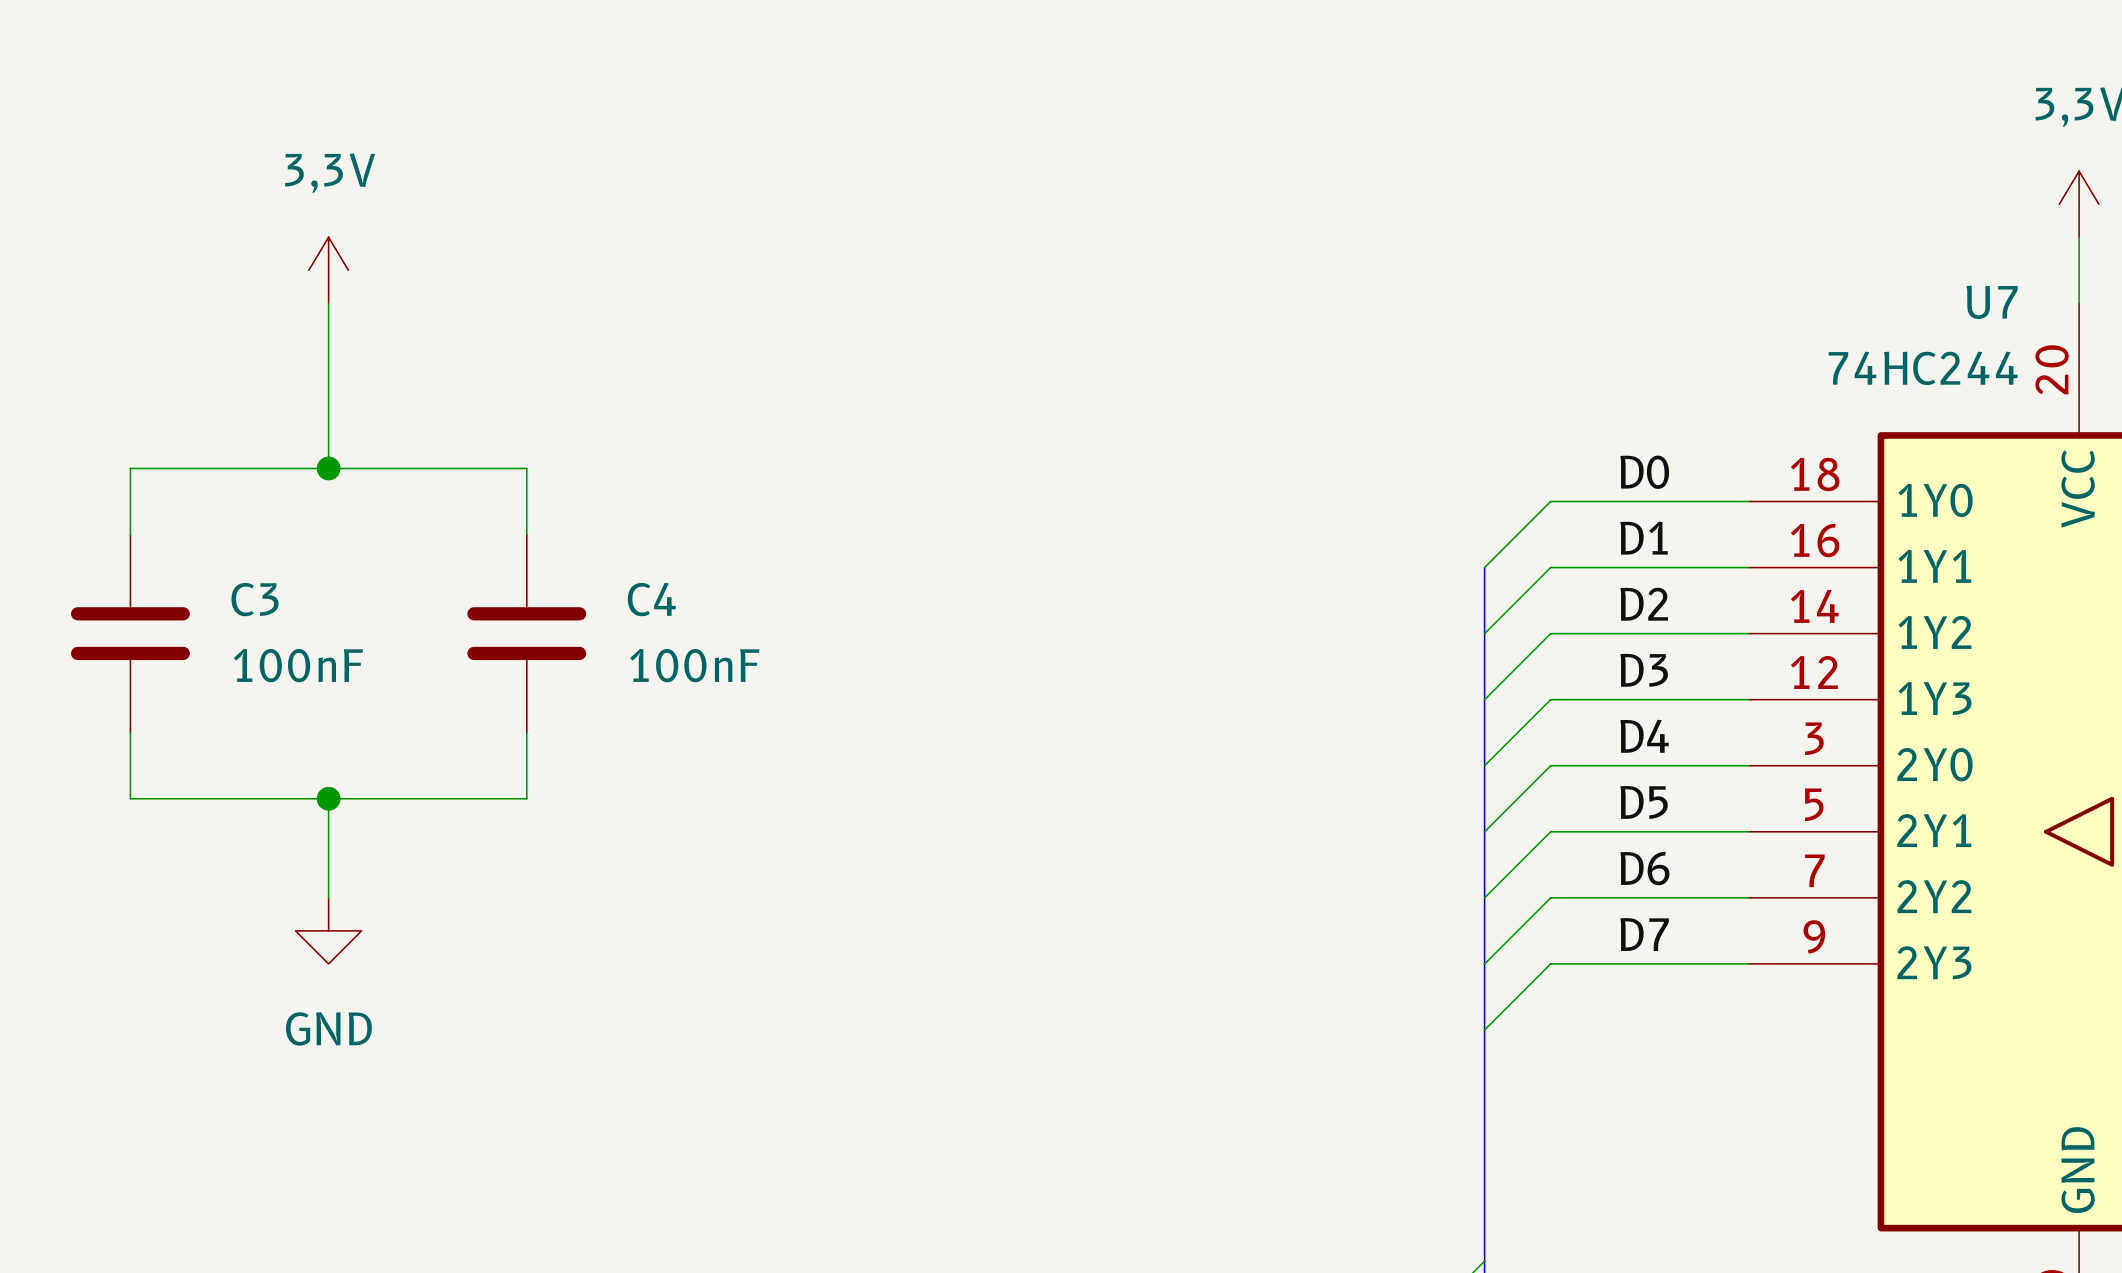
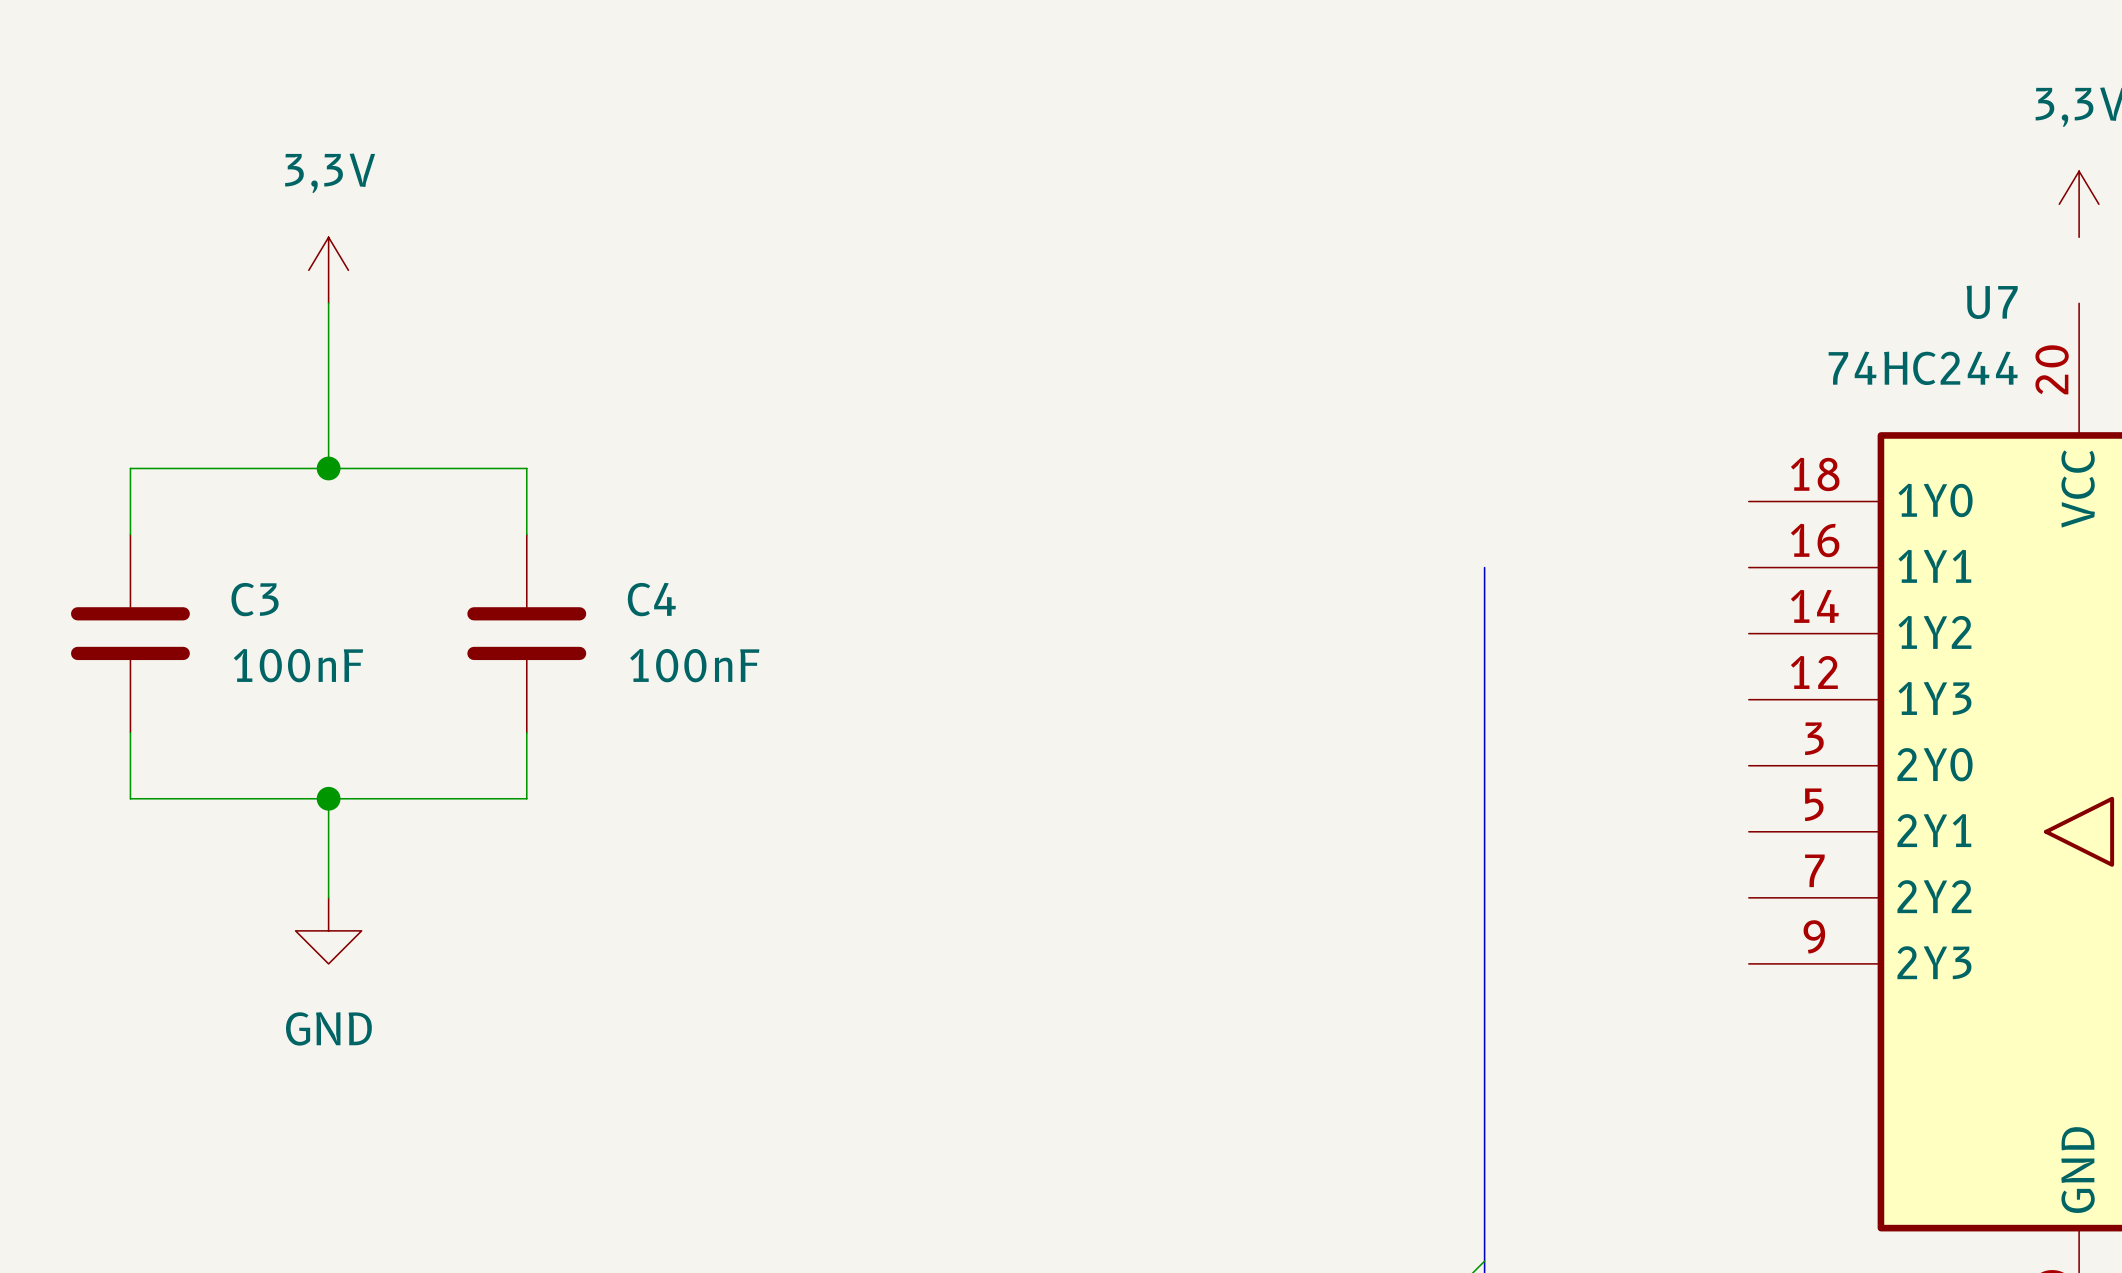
wire: (2079, 237) (2079, 303) -> none
label: D0 (1644, 472) -> none
wire: (1748, 501) (1550, 501) (1484, 567) -> none
label: D1 (1644, 538) -> none
wire: (1748, 567) (1550, 567) (1484, 633) -> none
label: D2 (1644, 604) -> none
wire: (1748, 633) (1550, 633) (1484, 699) -> none
label: D3 (1644, 670) -> none
wire: (1748, 699) (1550, 699) (1484, 765) -> none
label: D4 (1644, 736) -> none
wire: (1748, 765) (1550, 765) (1484, 831) -> none
label: D5 (1644, 802) -> none
wire: (1748, 831) (1550, 831) (1484, 897) -> none
label: D6 (1644, 868) -> none
wire: (1748, 897) (1550, 897) (1484, 963) -> none
label: D7 (1644, 934) -> none
wire: (1748, 963) (1550, 963) (1484, 1029) -> none

